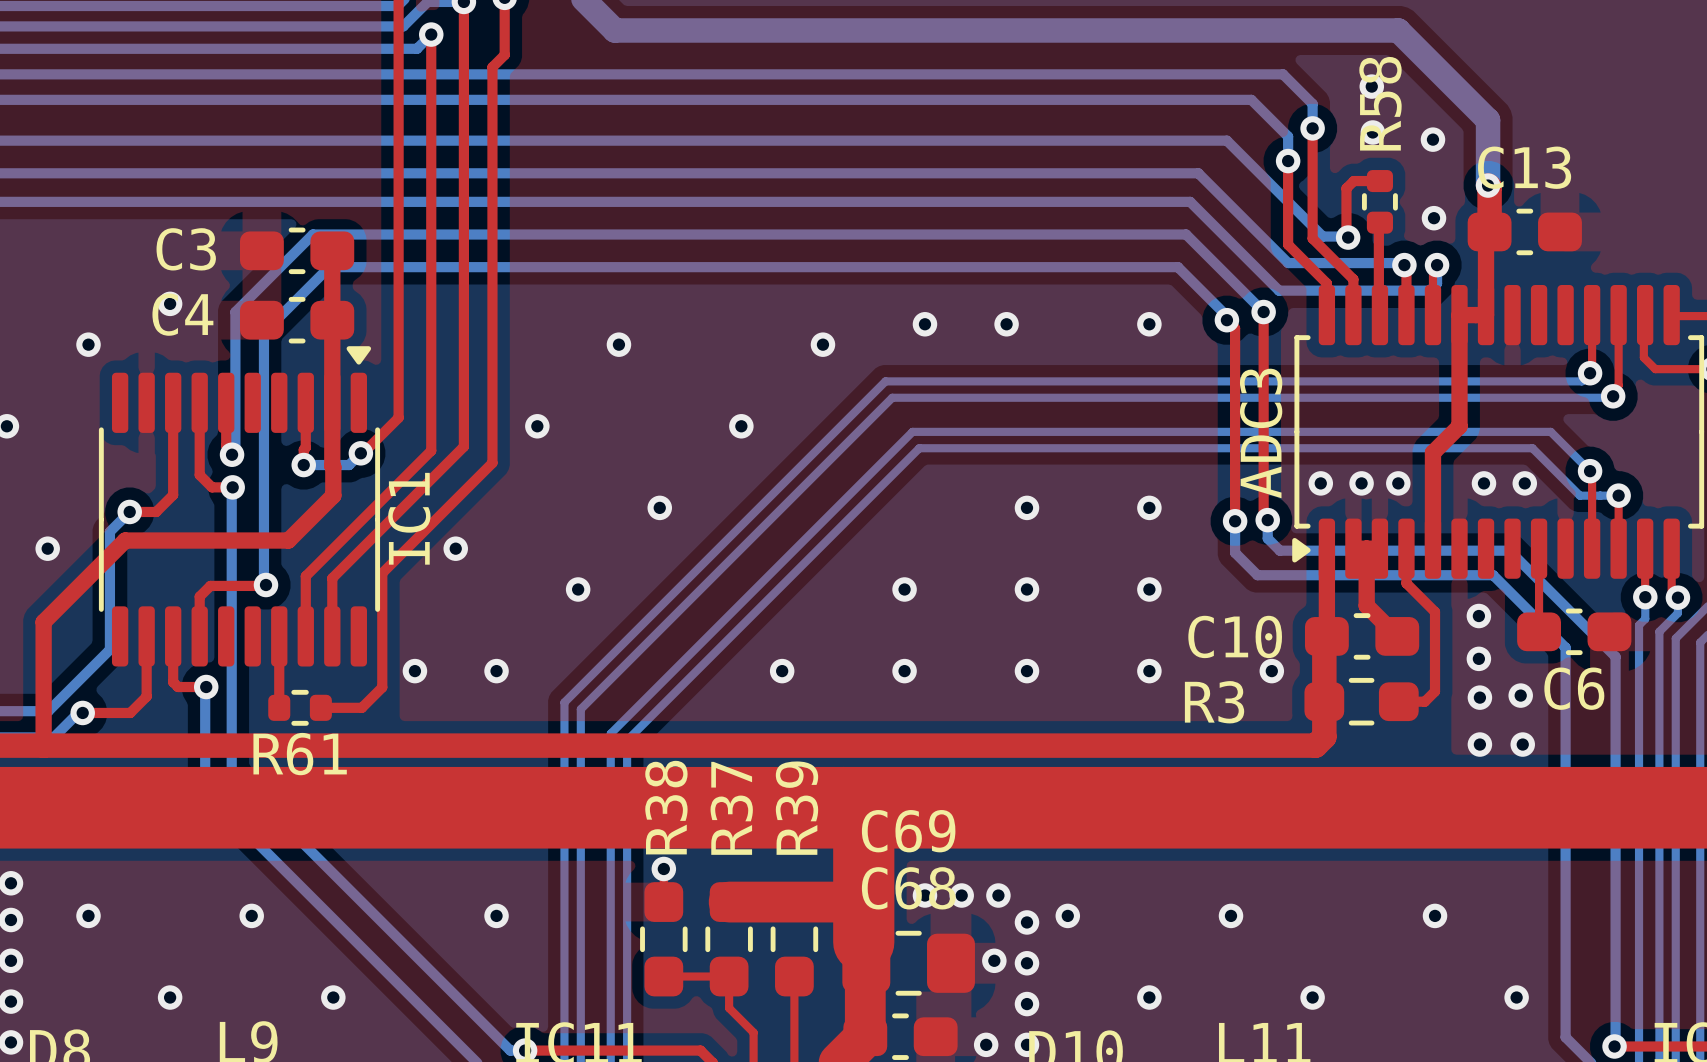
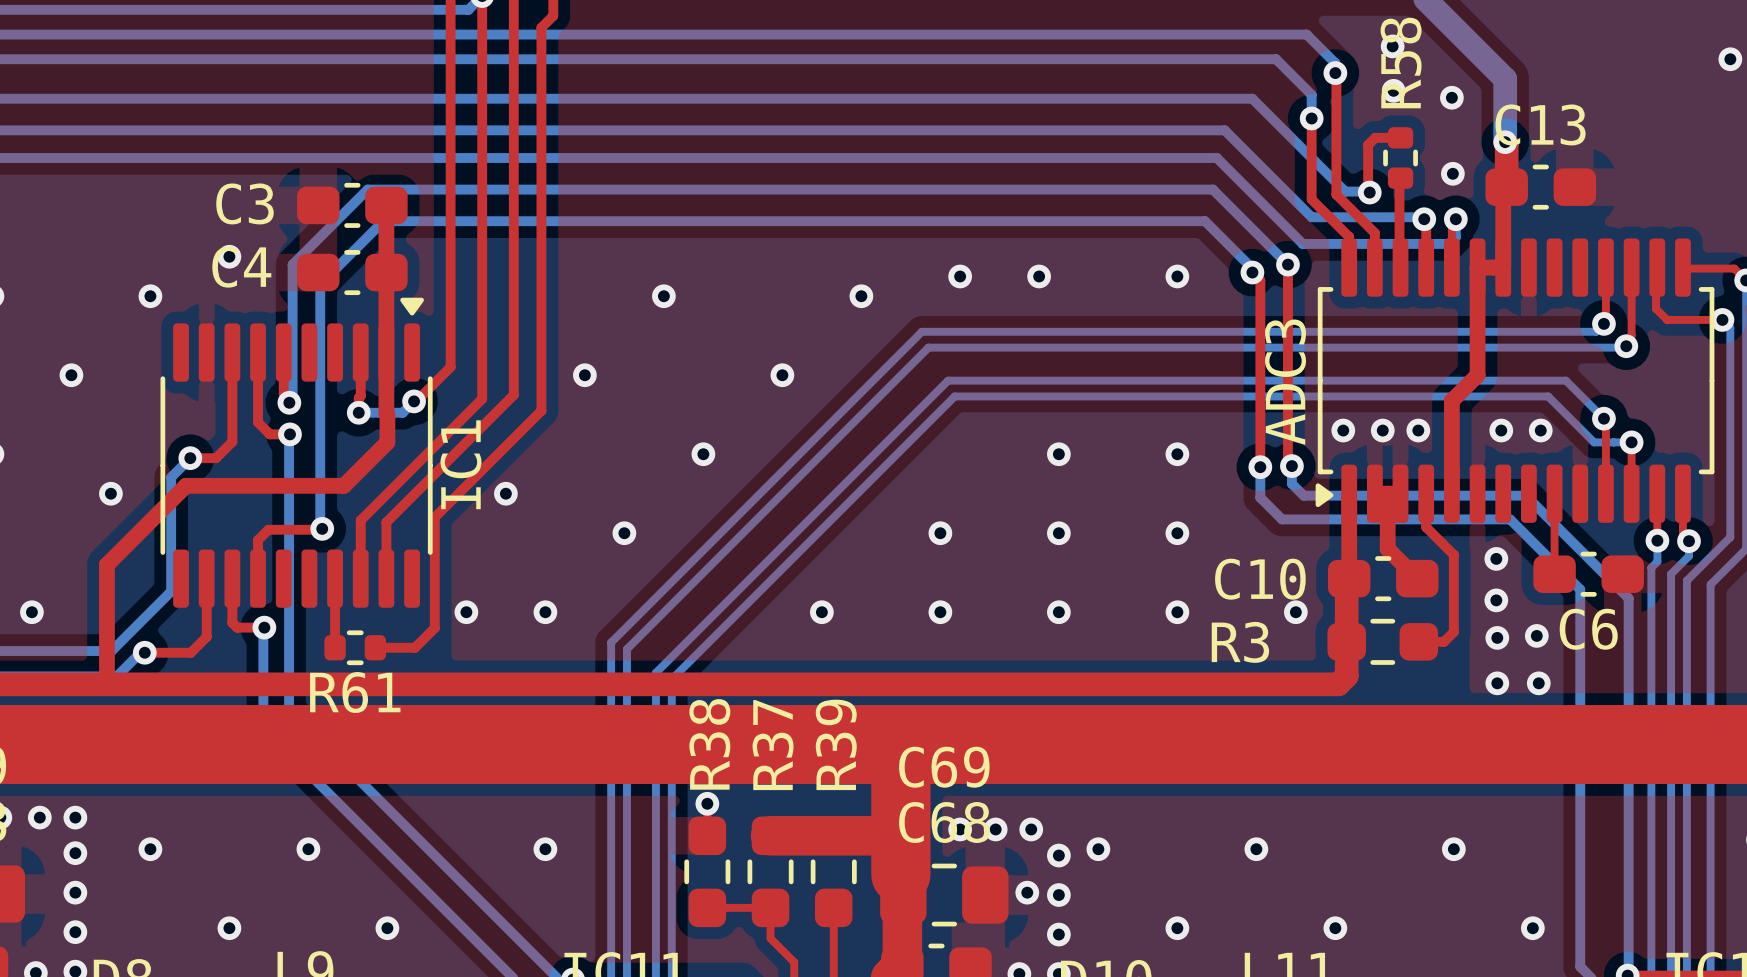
top track: (1312, 128) (1313, 239) -> (1335, 73) (1336, 194)
via position: (1312, 128) -> (1335, 73)

